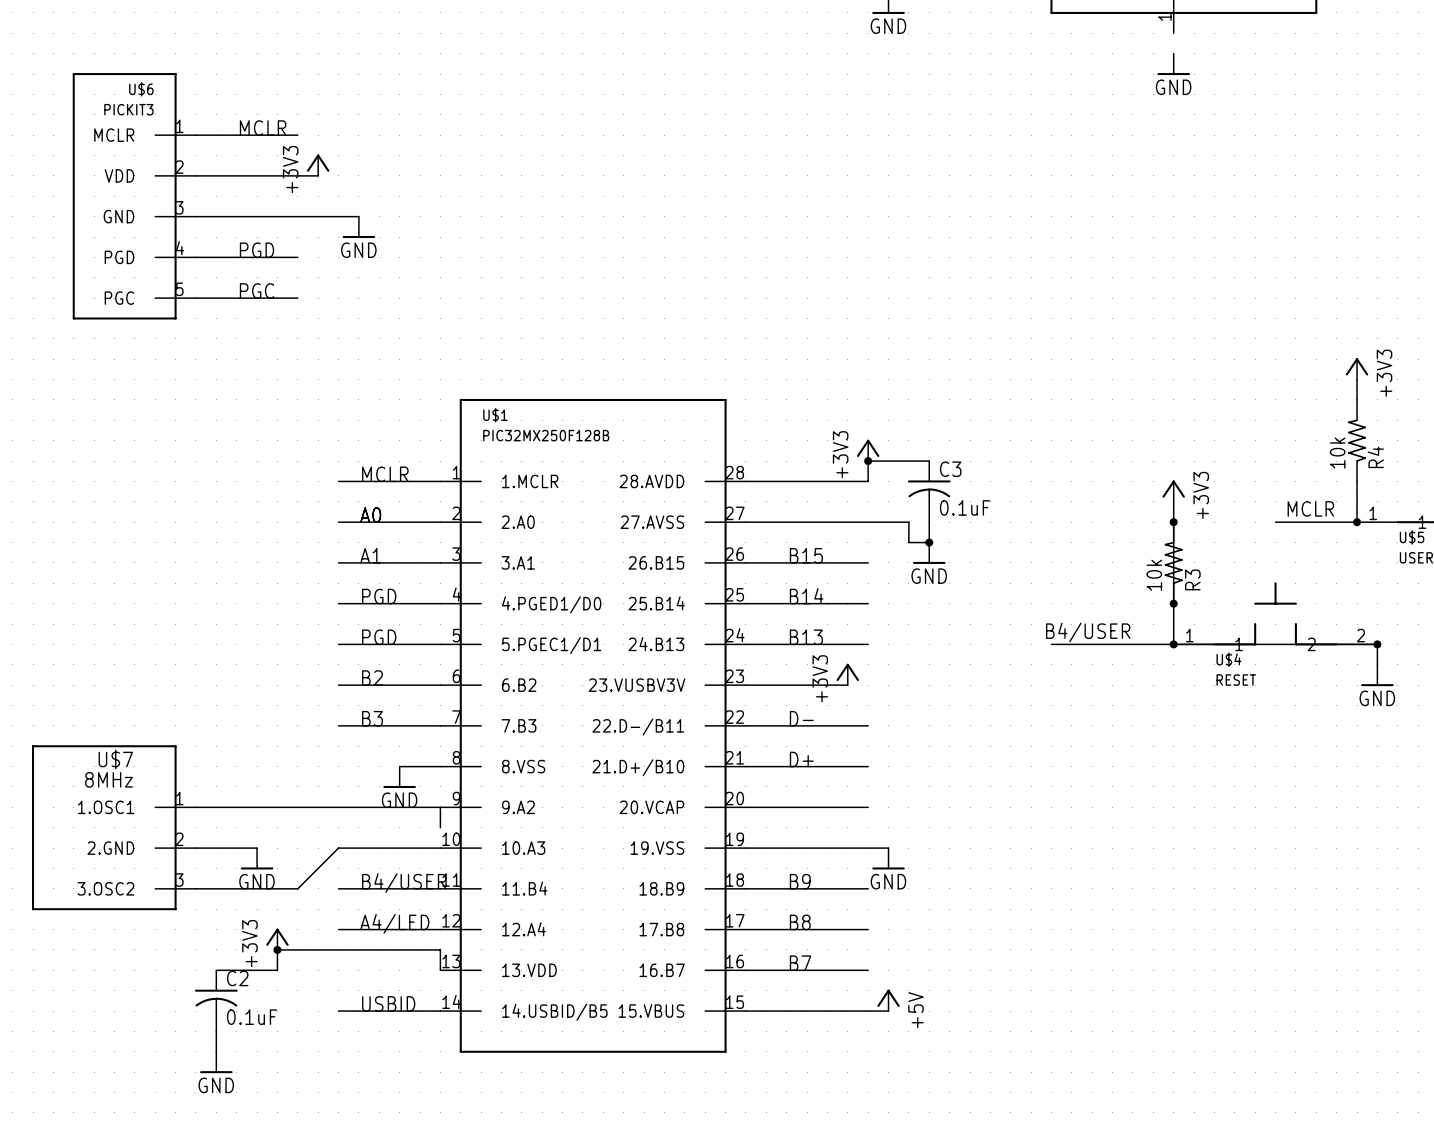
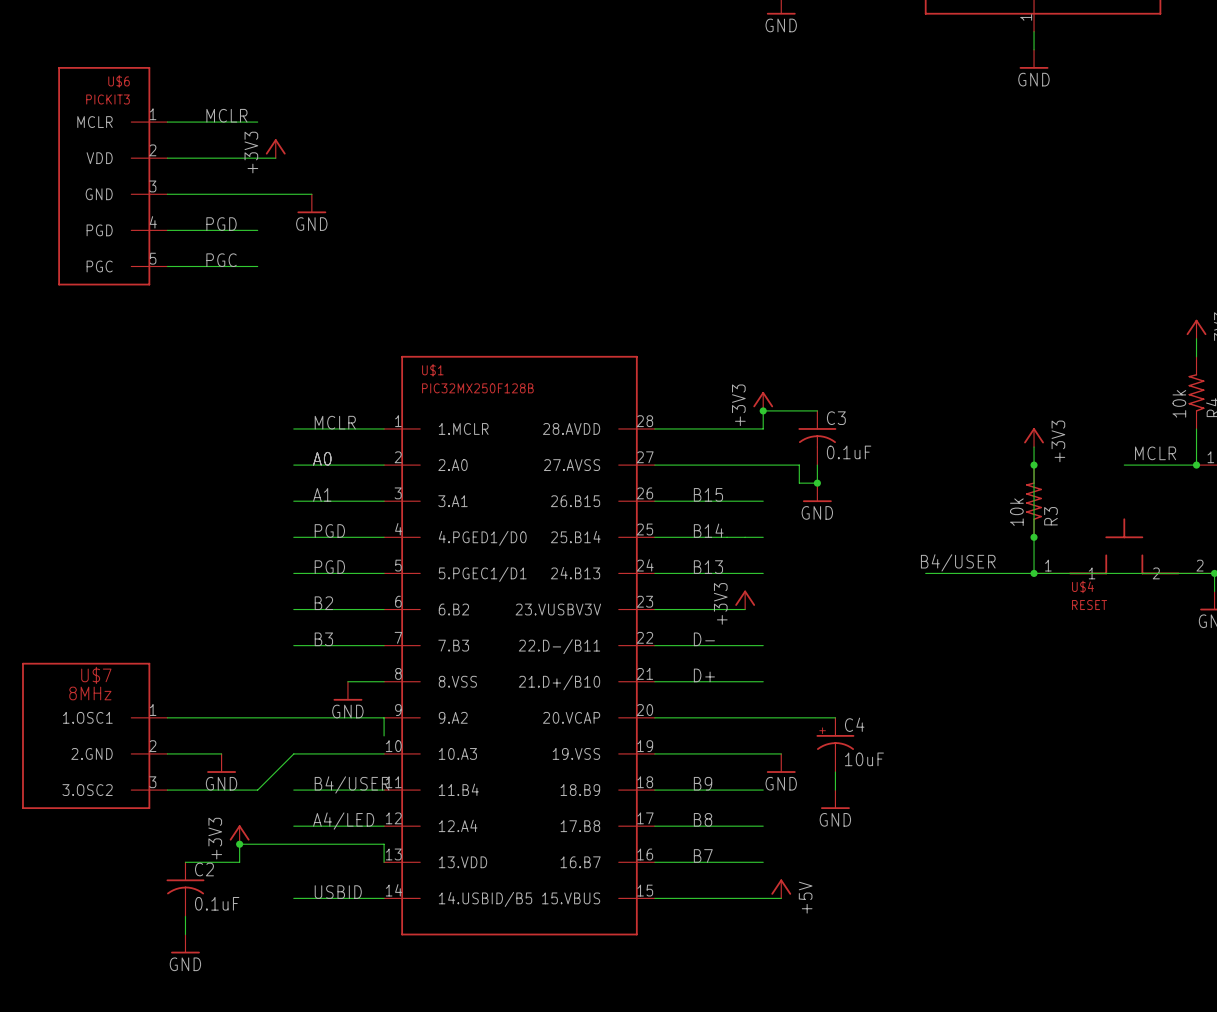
wire: none -> (1034, 31) (1034, 49)
wire: none -> (763, 717) (835, 717)
C4: none -> 10uF (835, 744)
wire: none -> (835, 772) (835, 790)
power symbol: none -> GND (835, 799)

